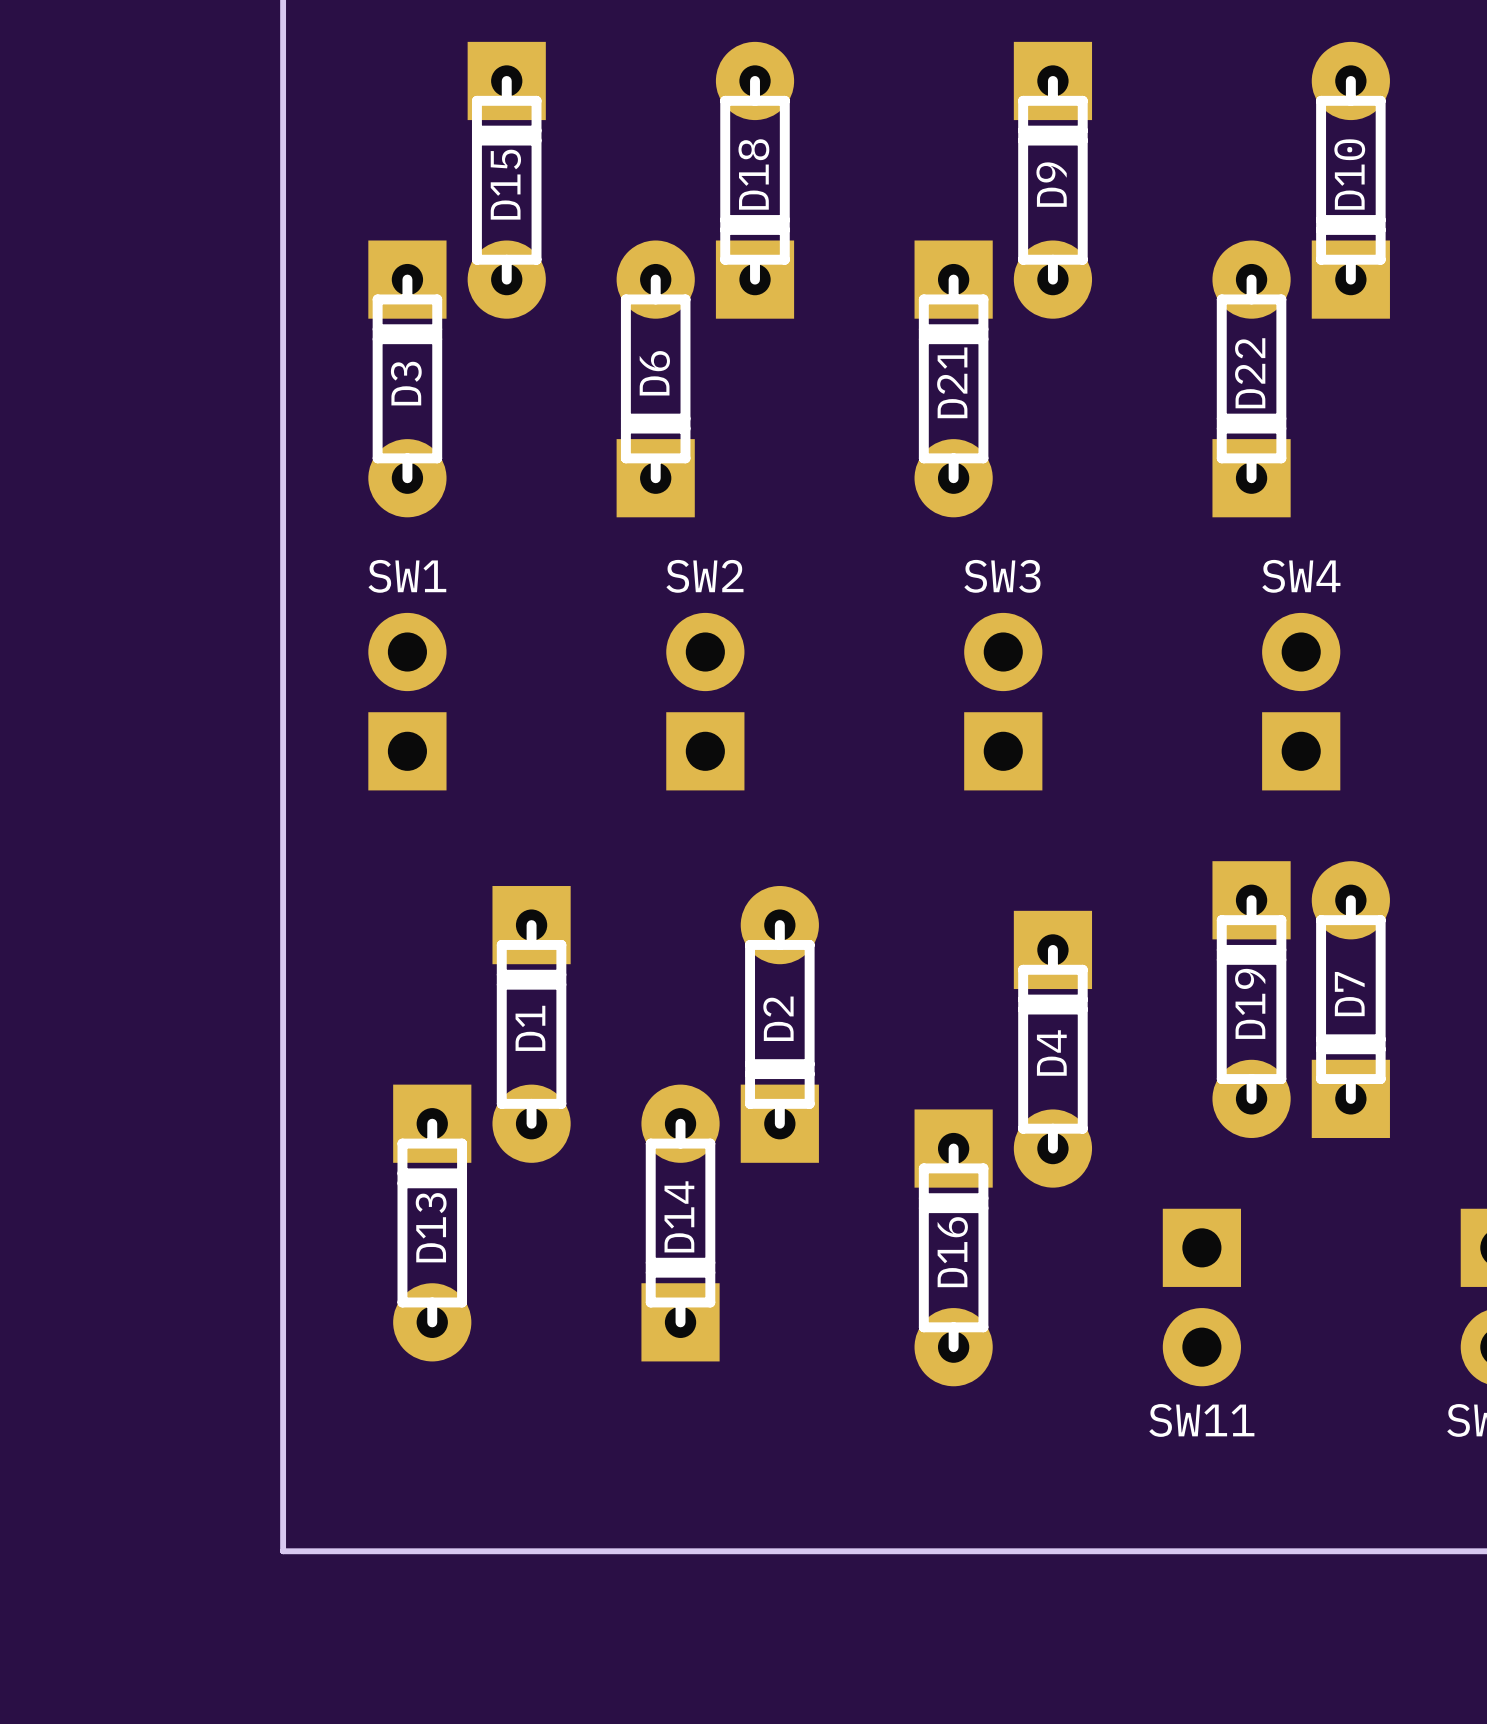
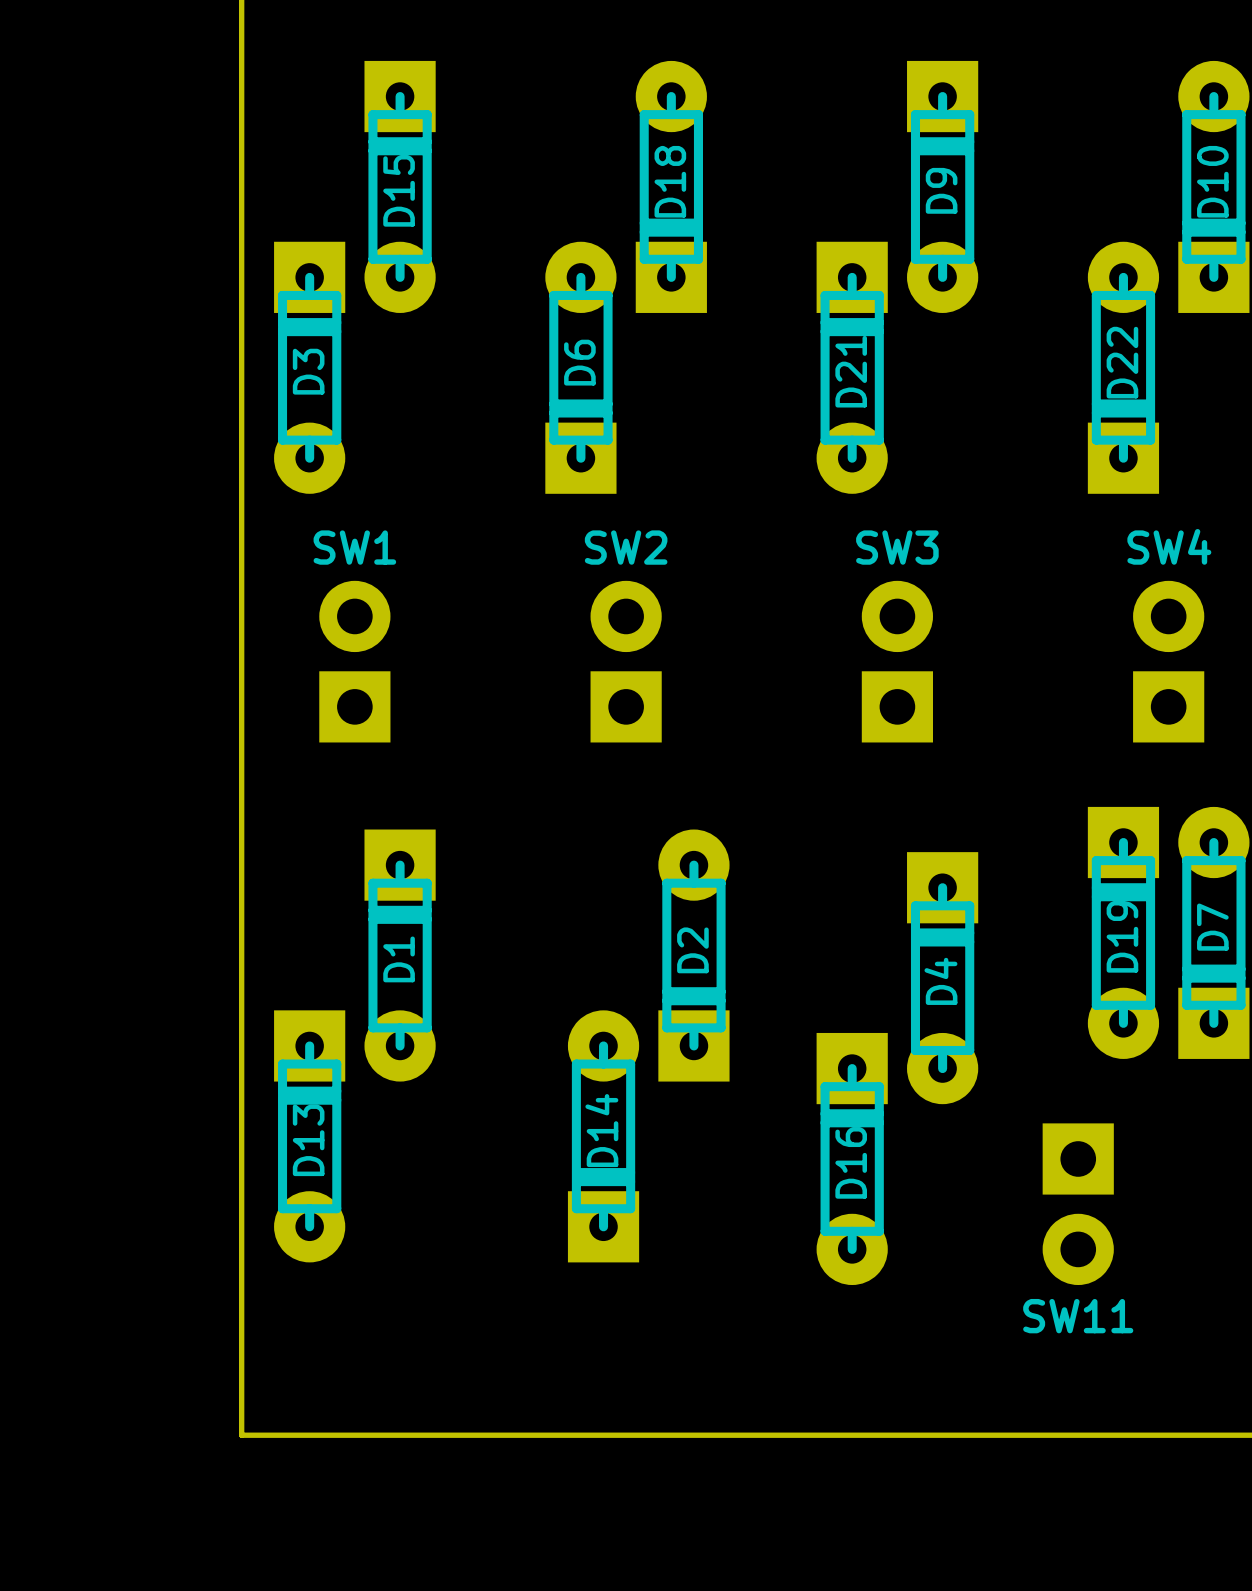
D15 position: (506, 180) -> (400, 186)
D3 position: (407, 378) -> (309, 367)
D1 position: (531, 1024) -> (400, 955)
D13 position: (432, 1223) -> (309, 1136)

